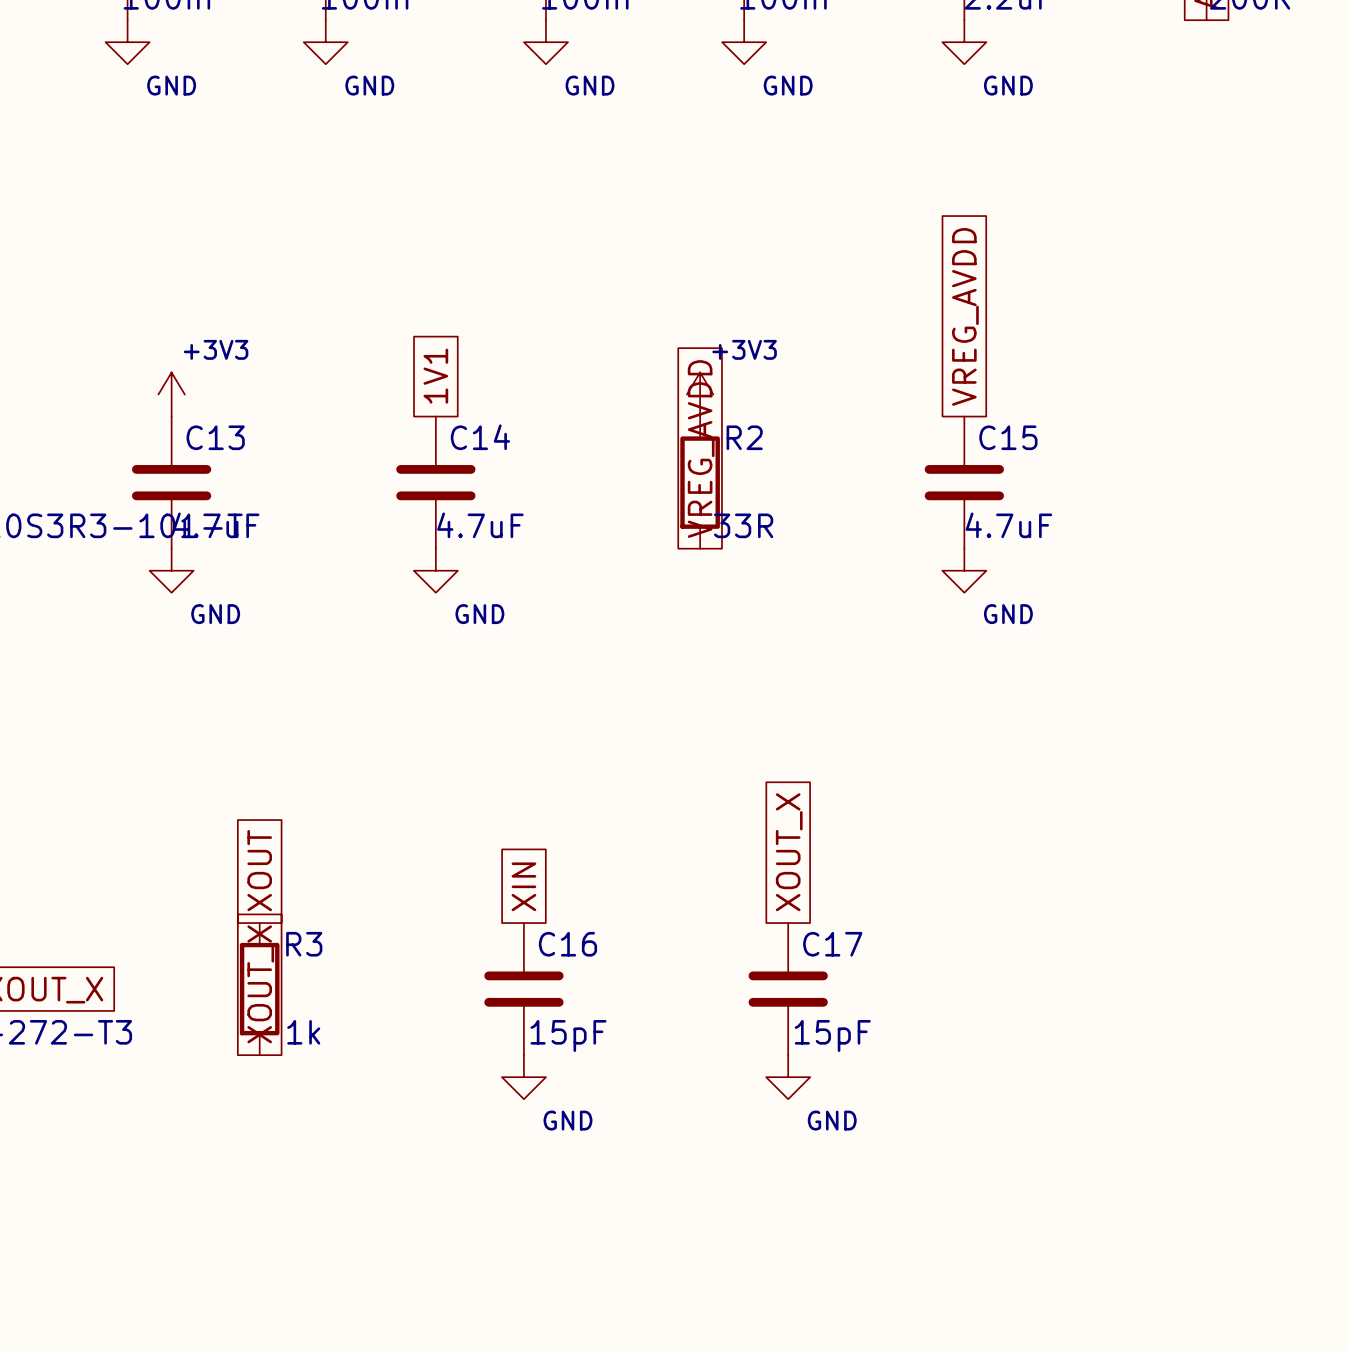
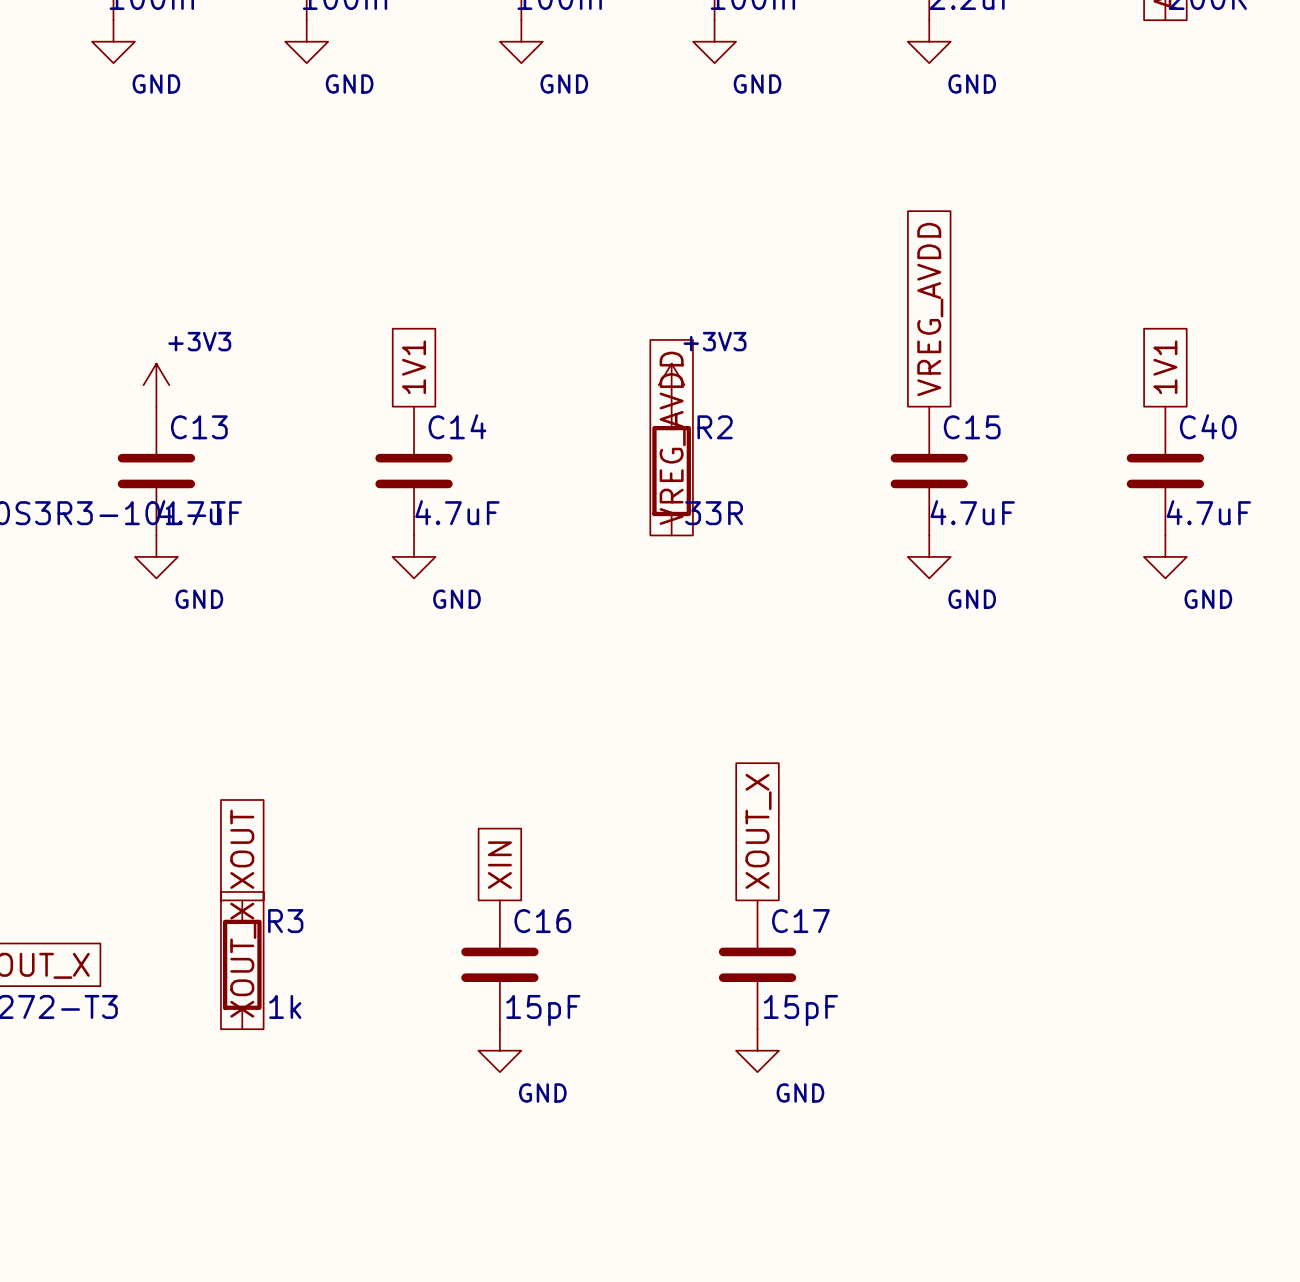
global label: none -> 1V1 (1165, 367)
C40: none -> 4.7uF (1165, 471)
power symbol: none -> GND (1165, 556)

